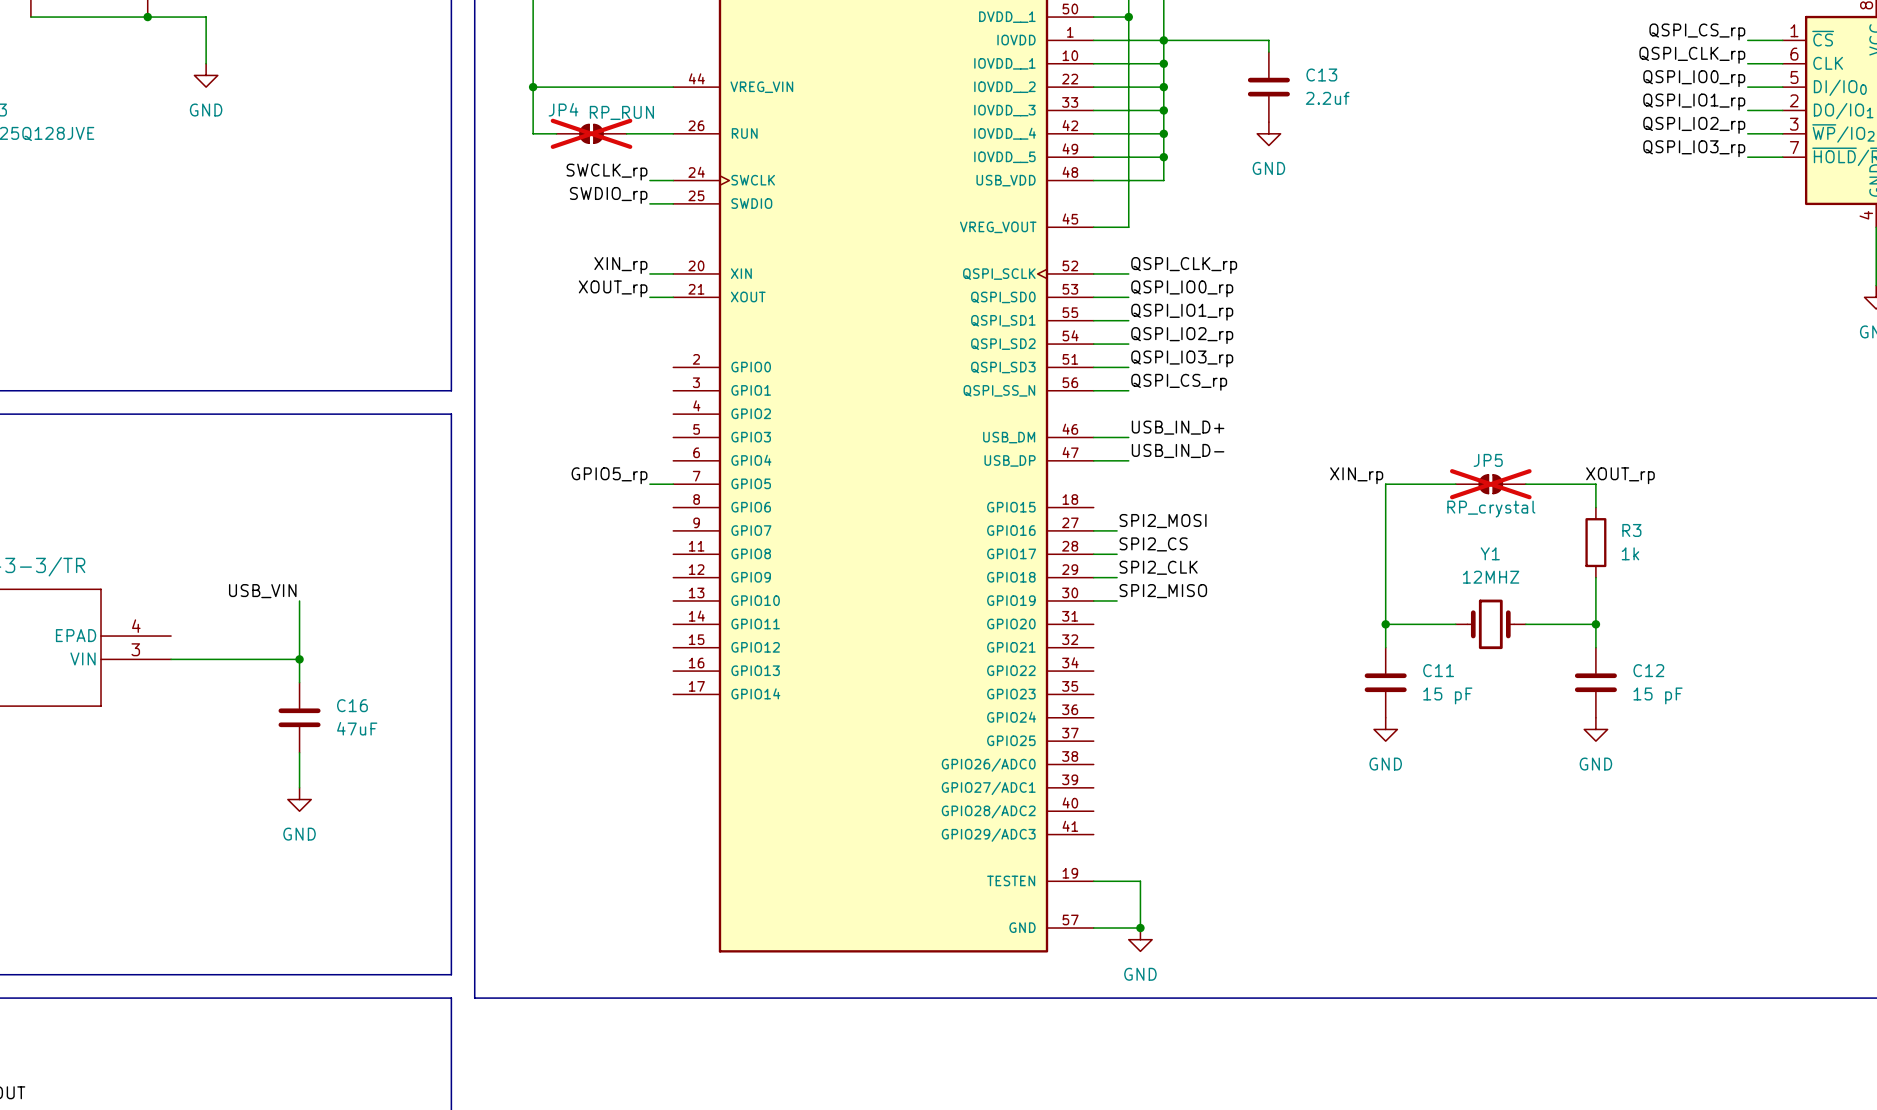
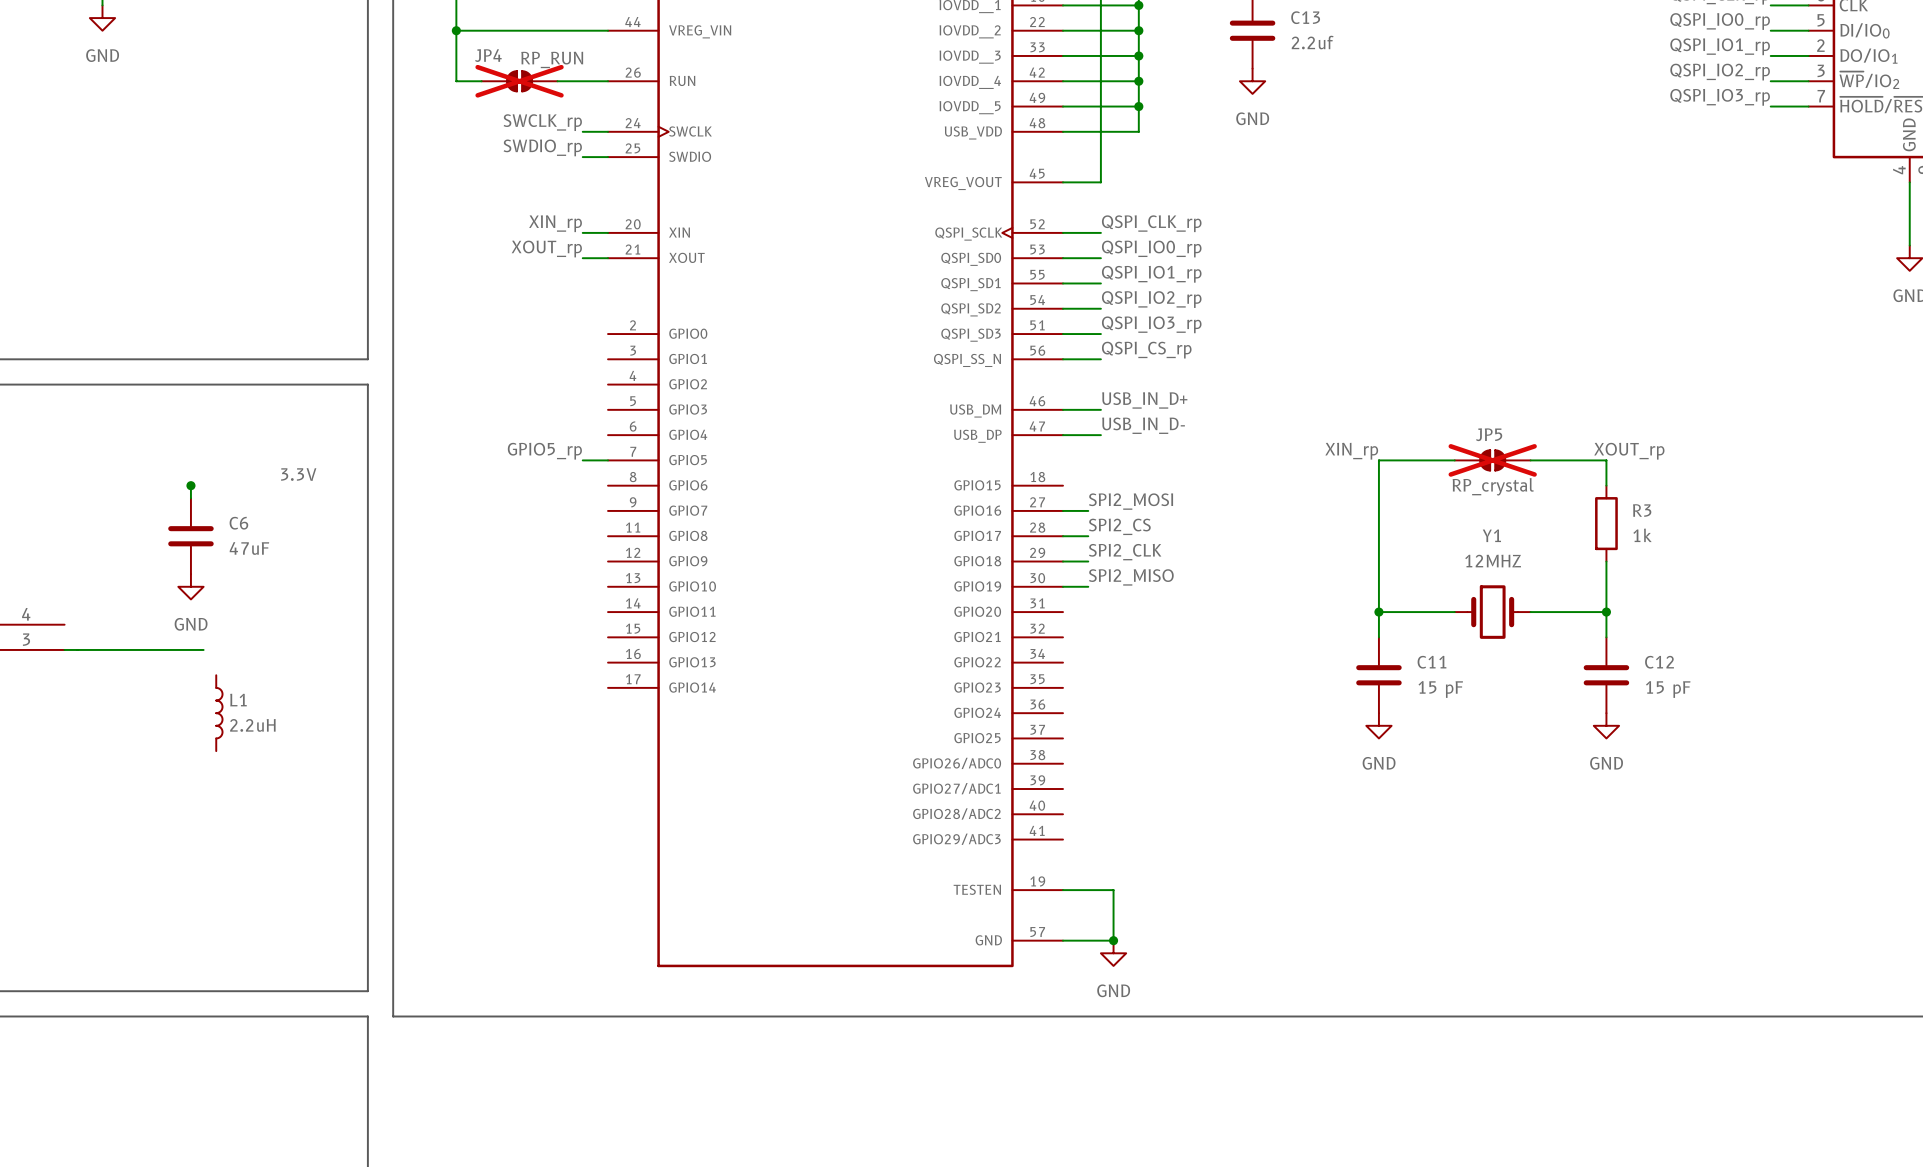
label: none -> 3.3V (298, 474)
wire: none -> (190, 485) (190, 498)
junction: none -> (190, 485)
C6: none -> 47uF (190, 536)
label: USB_VIN (262, 591) -> none
wire: (299, 600) (299, 682) -> none
junction: (299, 659) -> none
C16: 47uF (299, 717) -> none
L1: none -> 2.2uH (219, 713)
wire: (299, 752) (299, 787) -> none
power symbol position: GND (299, 799) -> GND (190, 586)

